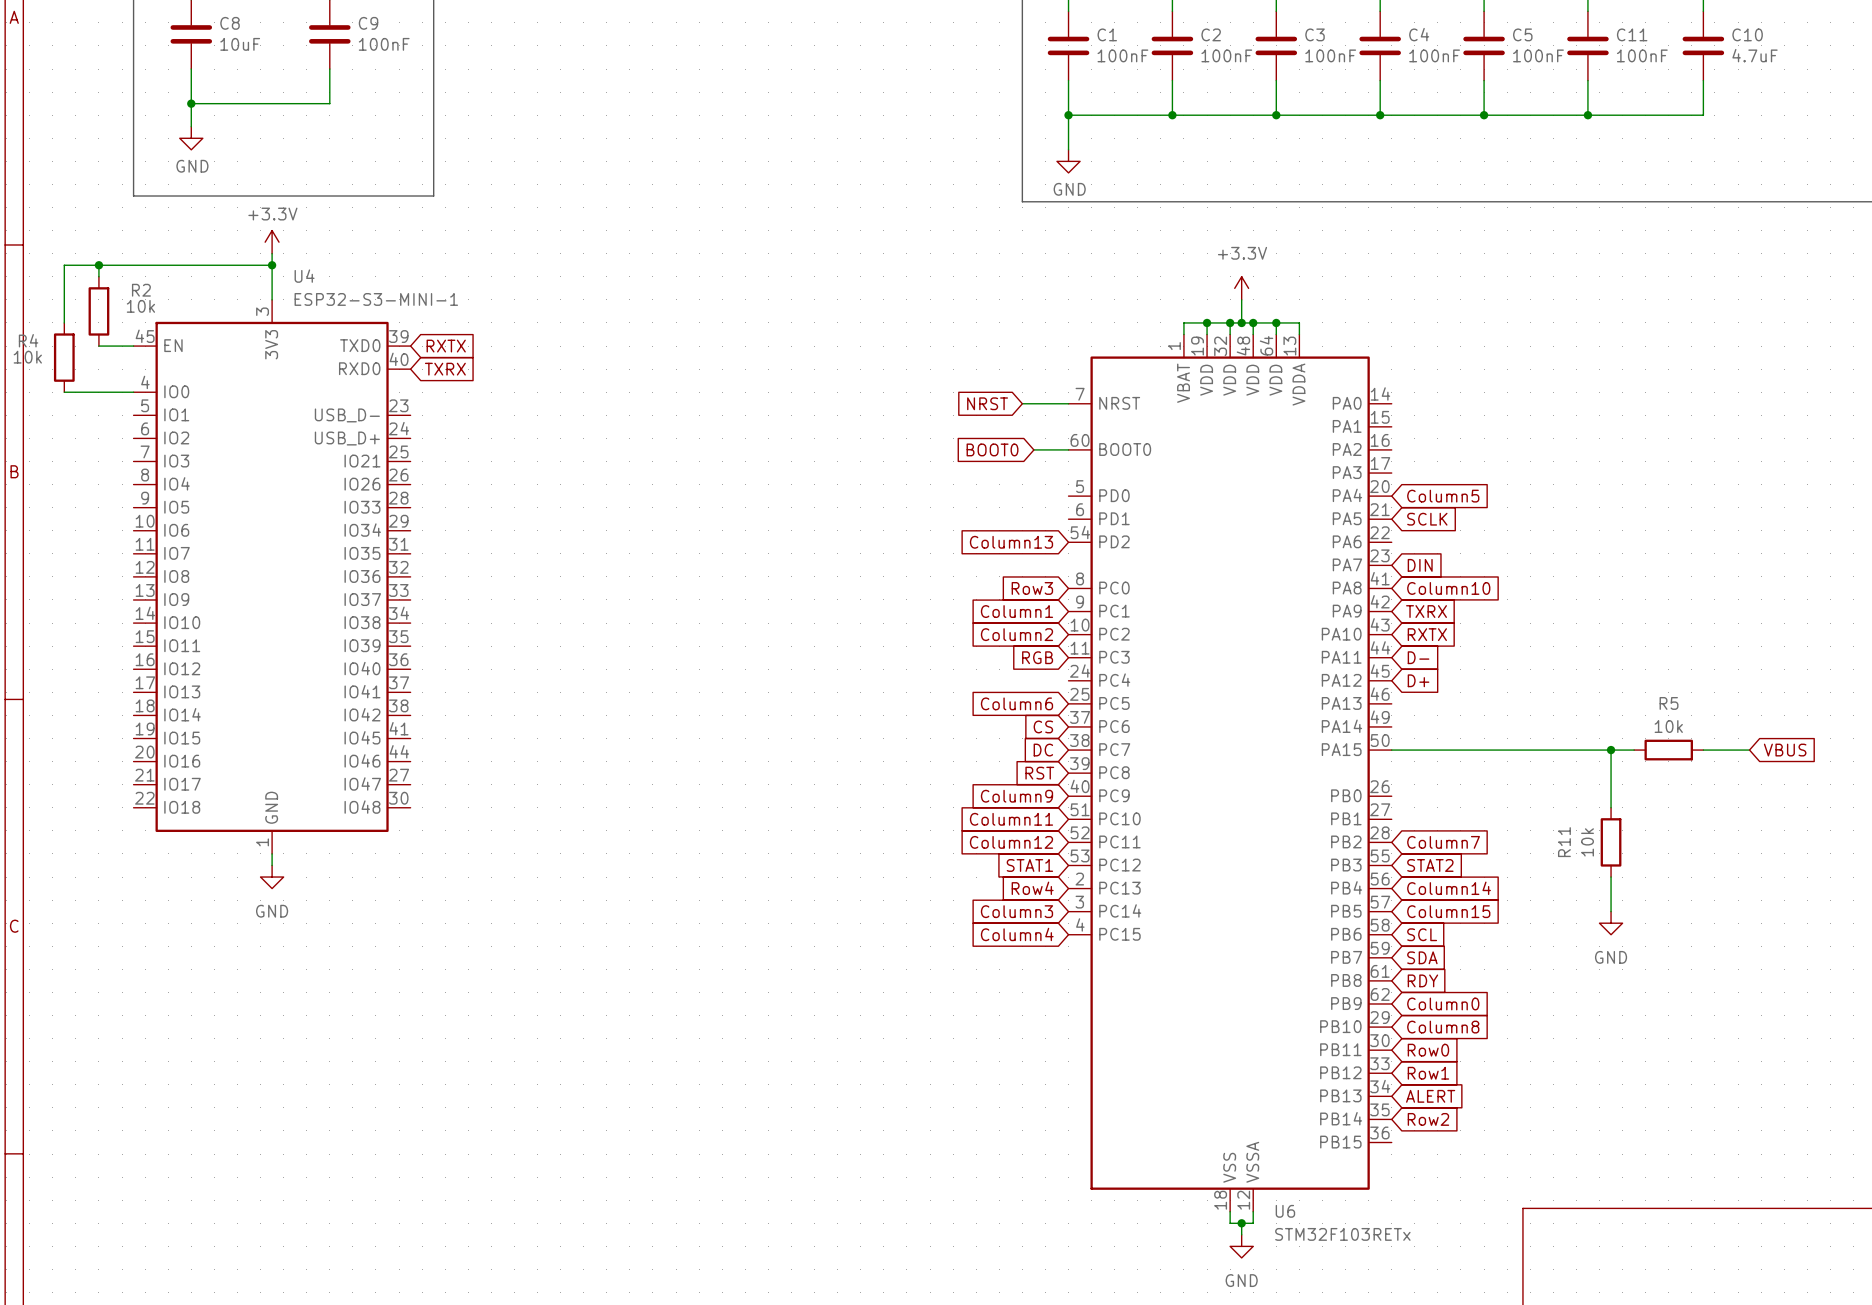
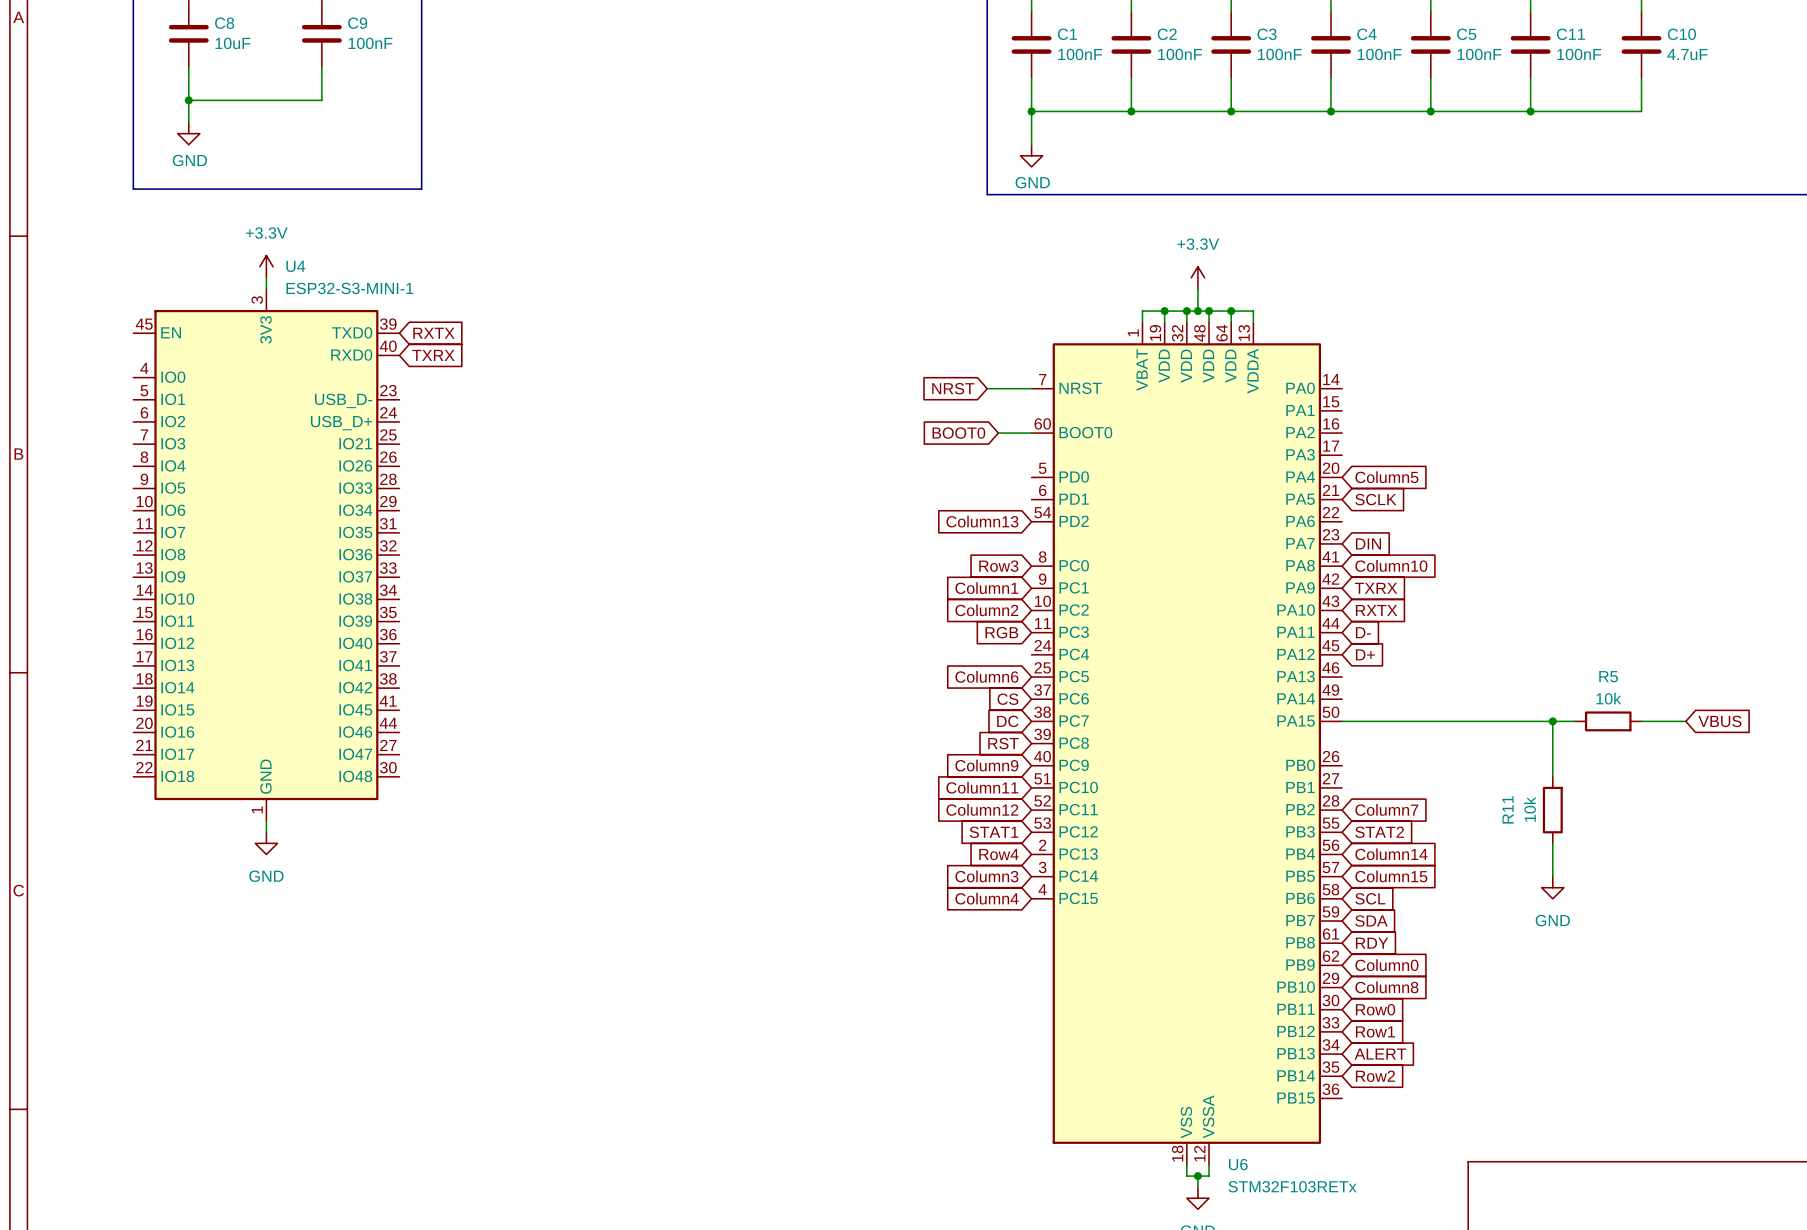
power symbol text position: +3.3V (272, 214) -> +3.3V (266, 233)
power symbol position: +3.3V (272, 242) -> +3.3V (266, 266)
wire: (98, 265) (98, 276) -> none
junction: (98, 265) -> none
wire: (272, 265) (64, 265) (64, 322) -> none
junction: (272, 265) -> none
R2: 10k (98, 311) -> none
wire: (98, 346) (133, 346) -> none
R4: 10k (64, 357) -> none
wire: (64, 392) (133, 392) -> none

